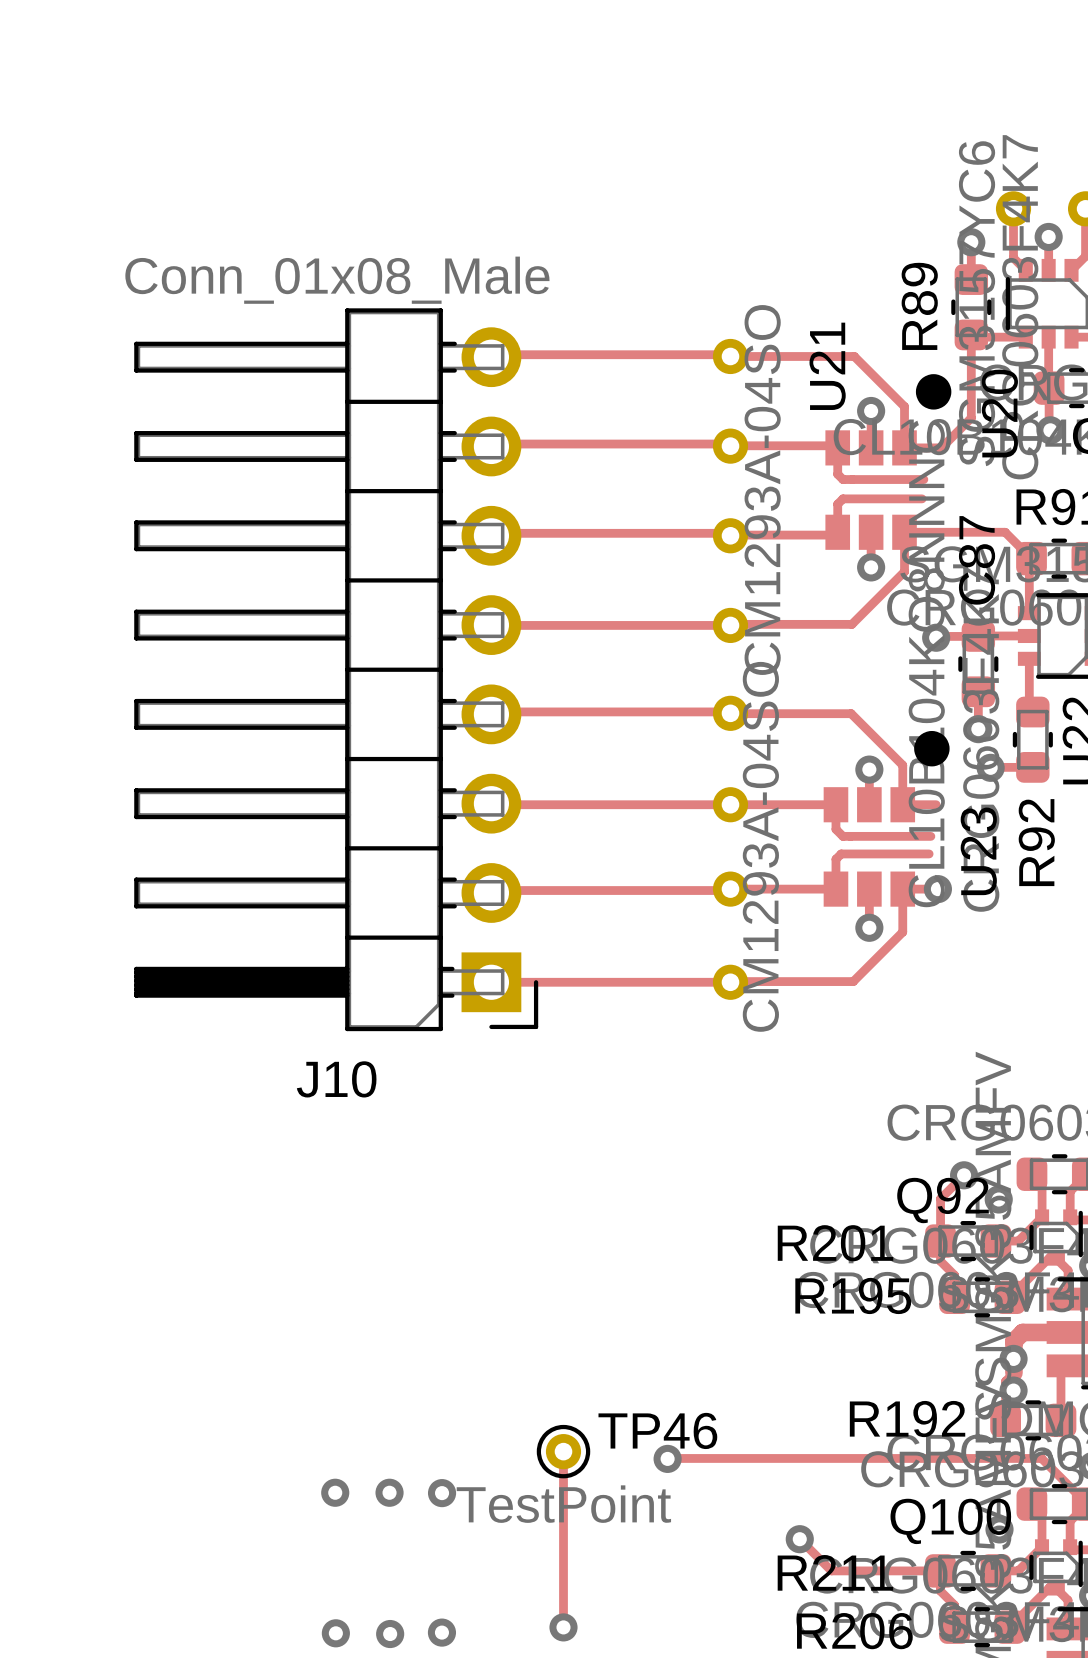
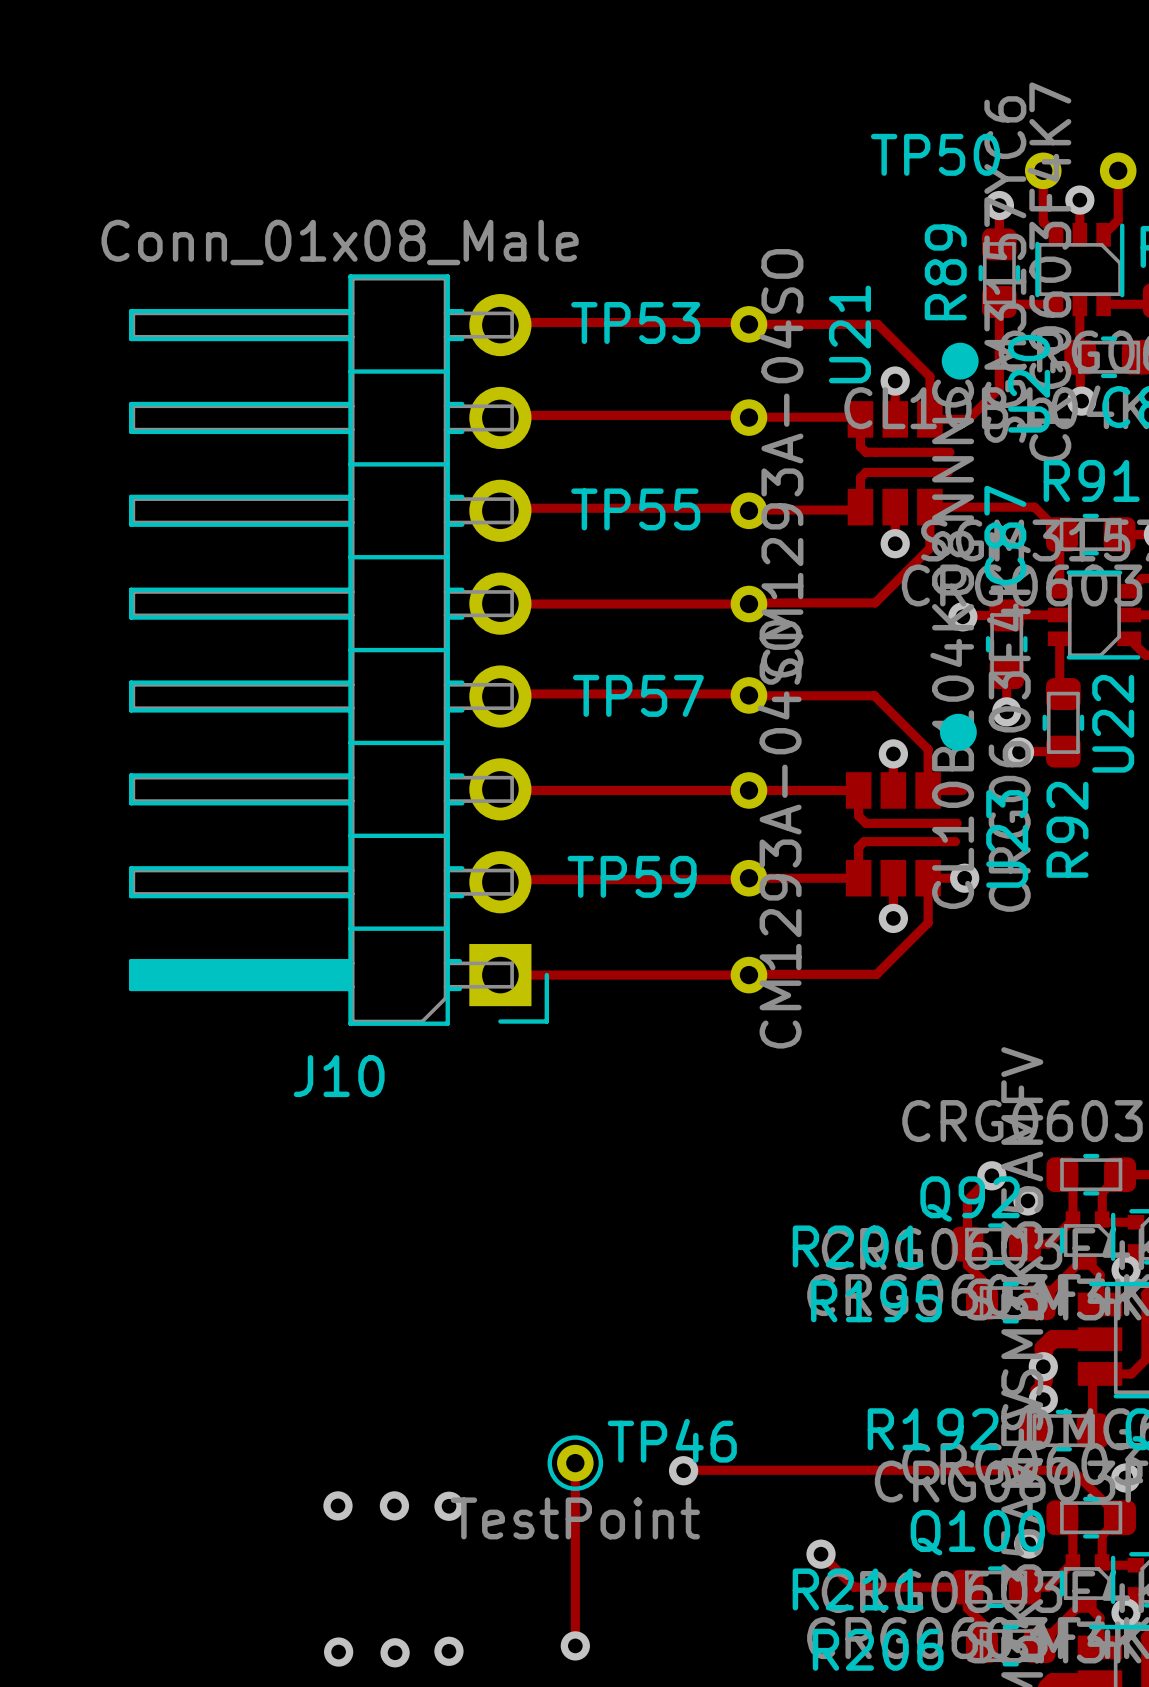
TP50 name: none -> TP50 (935, 154)
TP53 name: none -> TP53 (635, 323)
TP55 name: none -> TP55 (635, 509)
TP57 name: none -> TP57 (638, 695)
TP59 name: none -> TP59 (632, 876)

